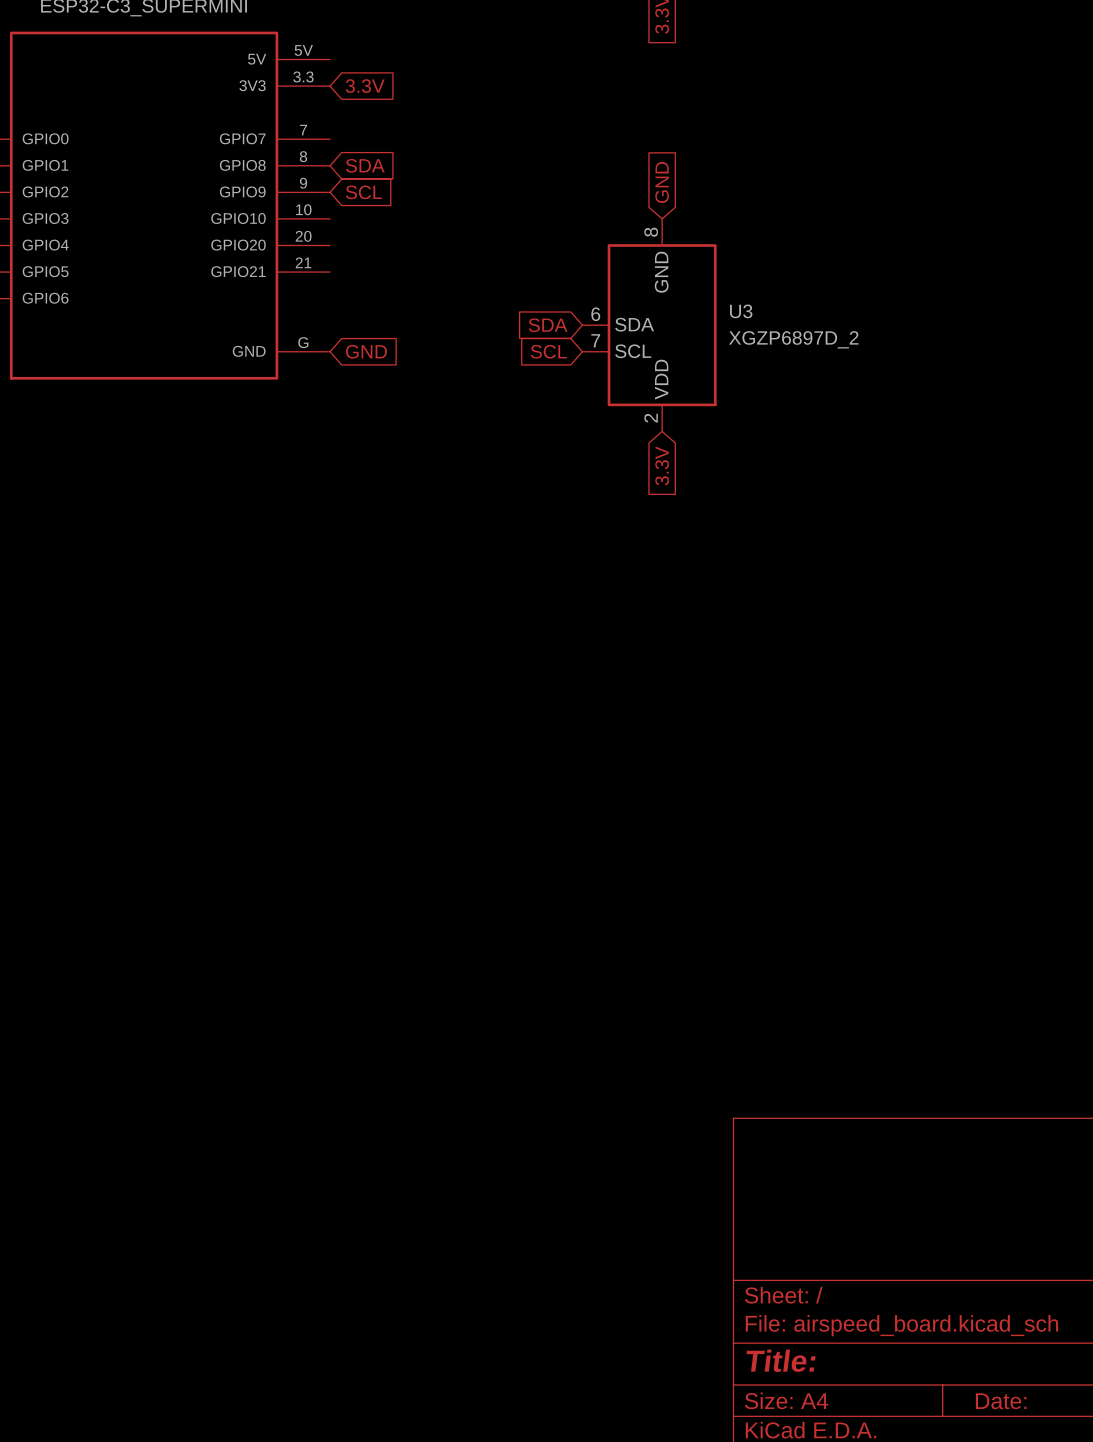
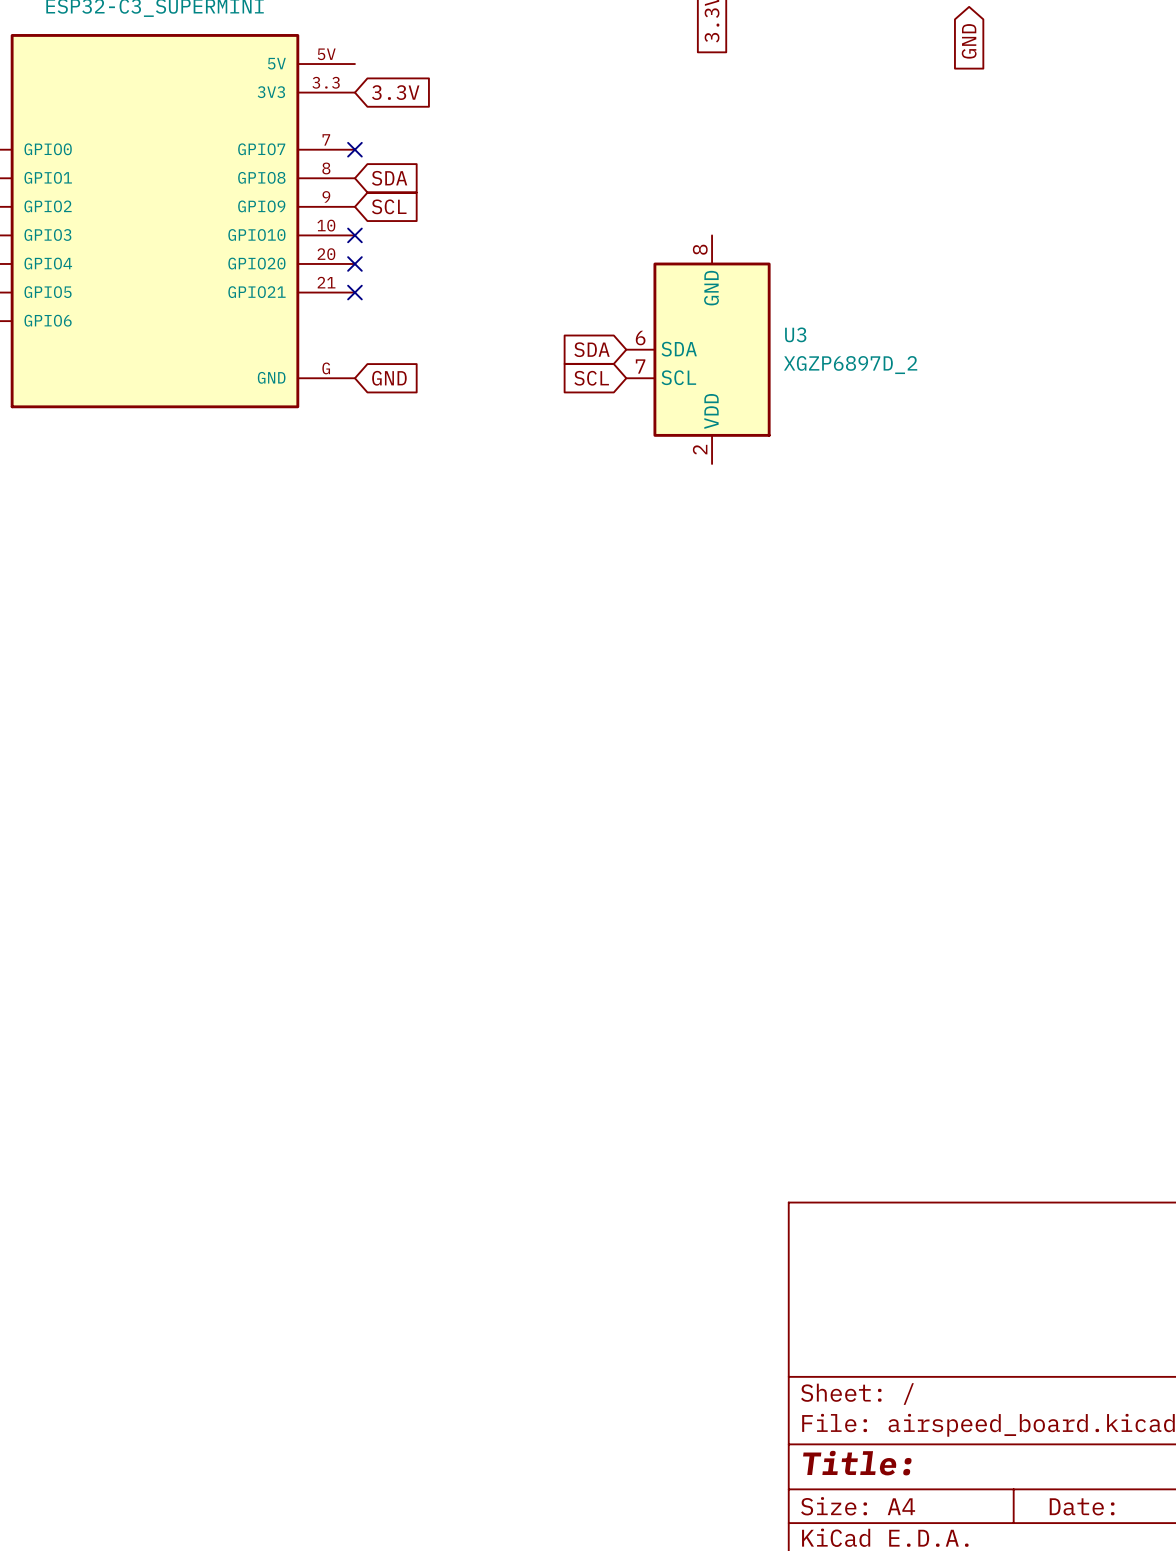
global label: none -> GND (969, 41)
no-connect mark: none -> (354, 149)
global label: GND (662, 182) -> none
no-connect mark: none -> (354, 235)
no-connect mark: none -> (354, 263)
no-connect mark: none -> (354, 292)
global label: 3.3V (662, 465) -> none

